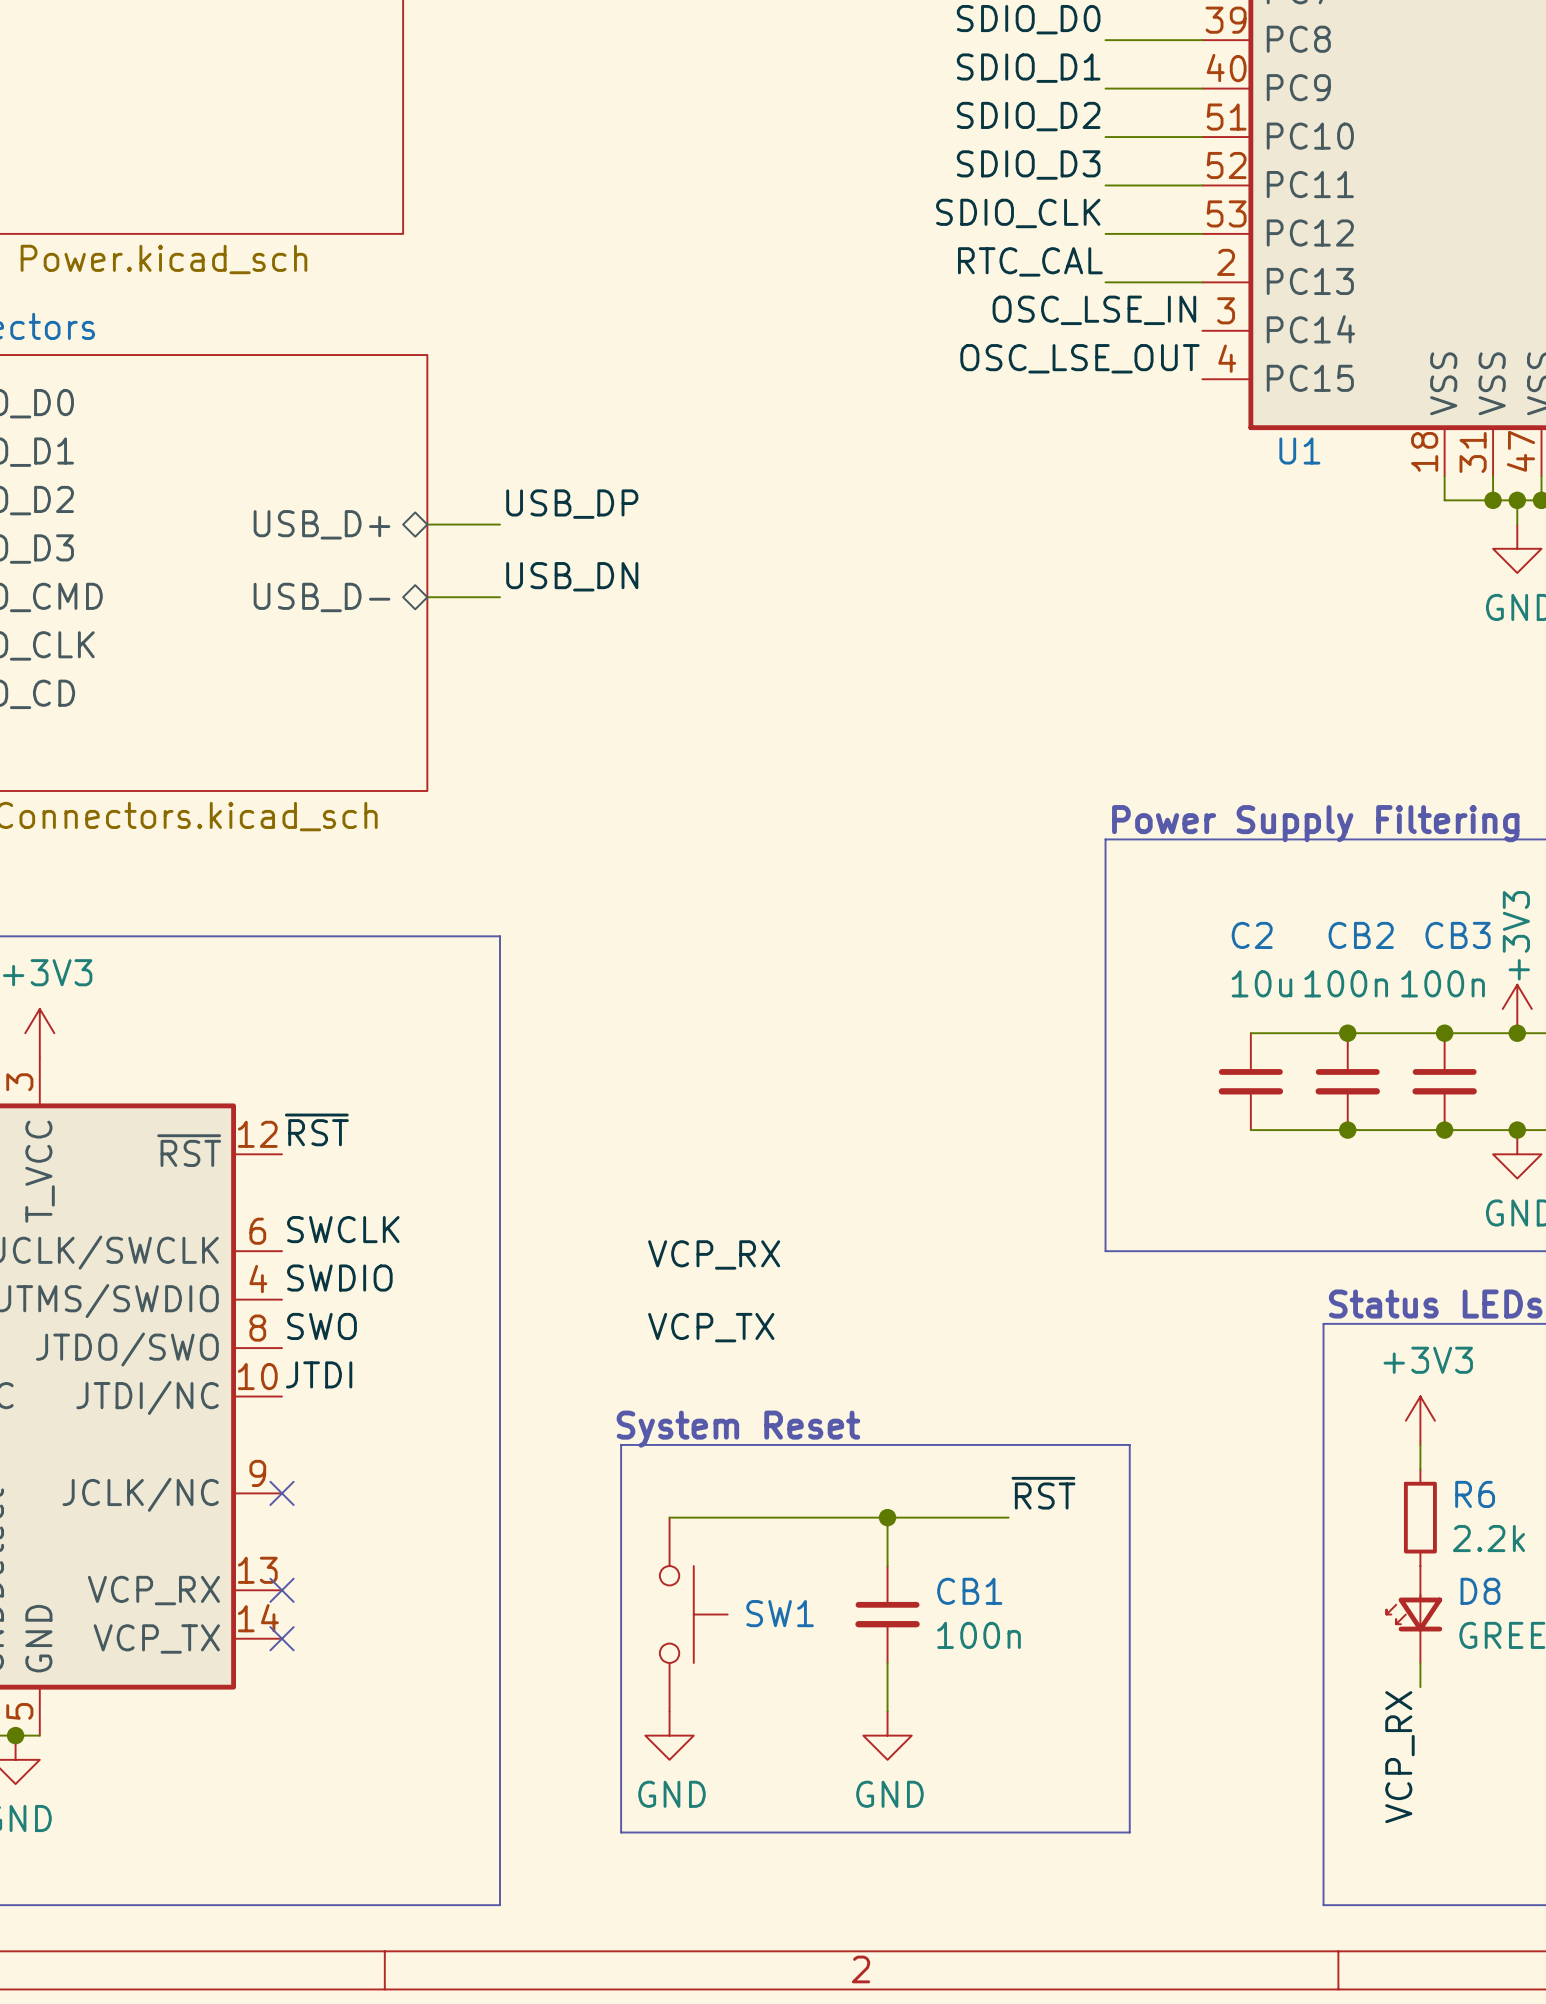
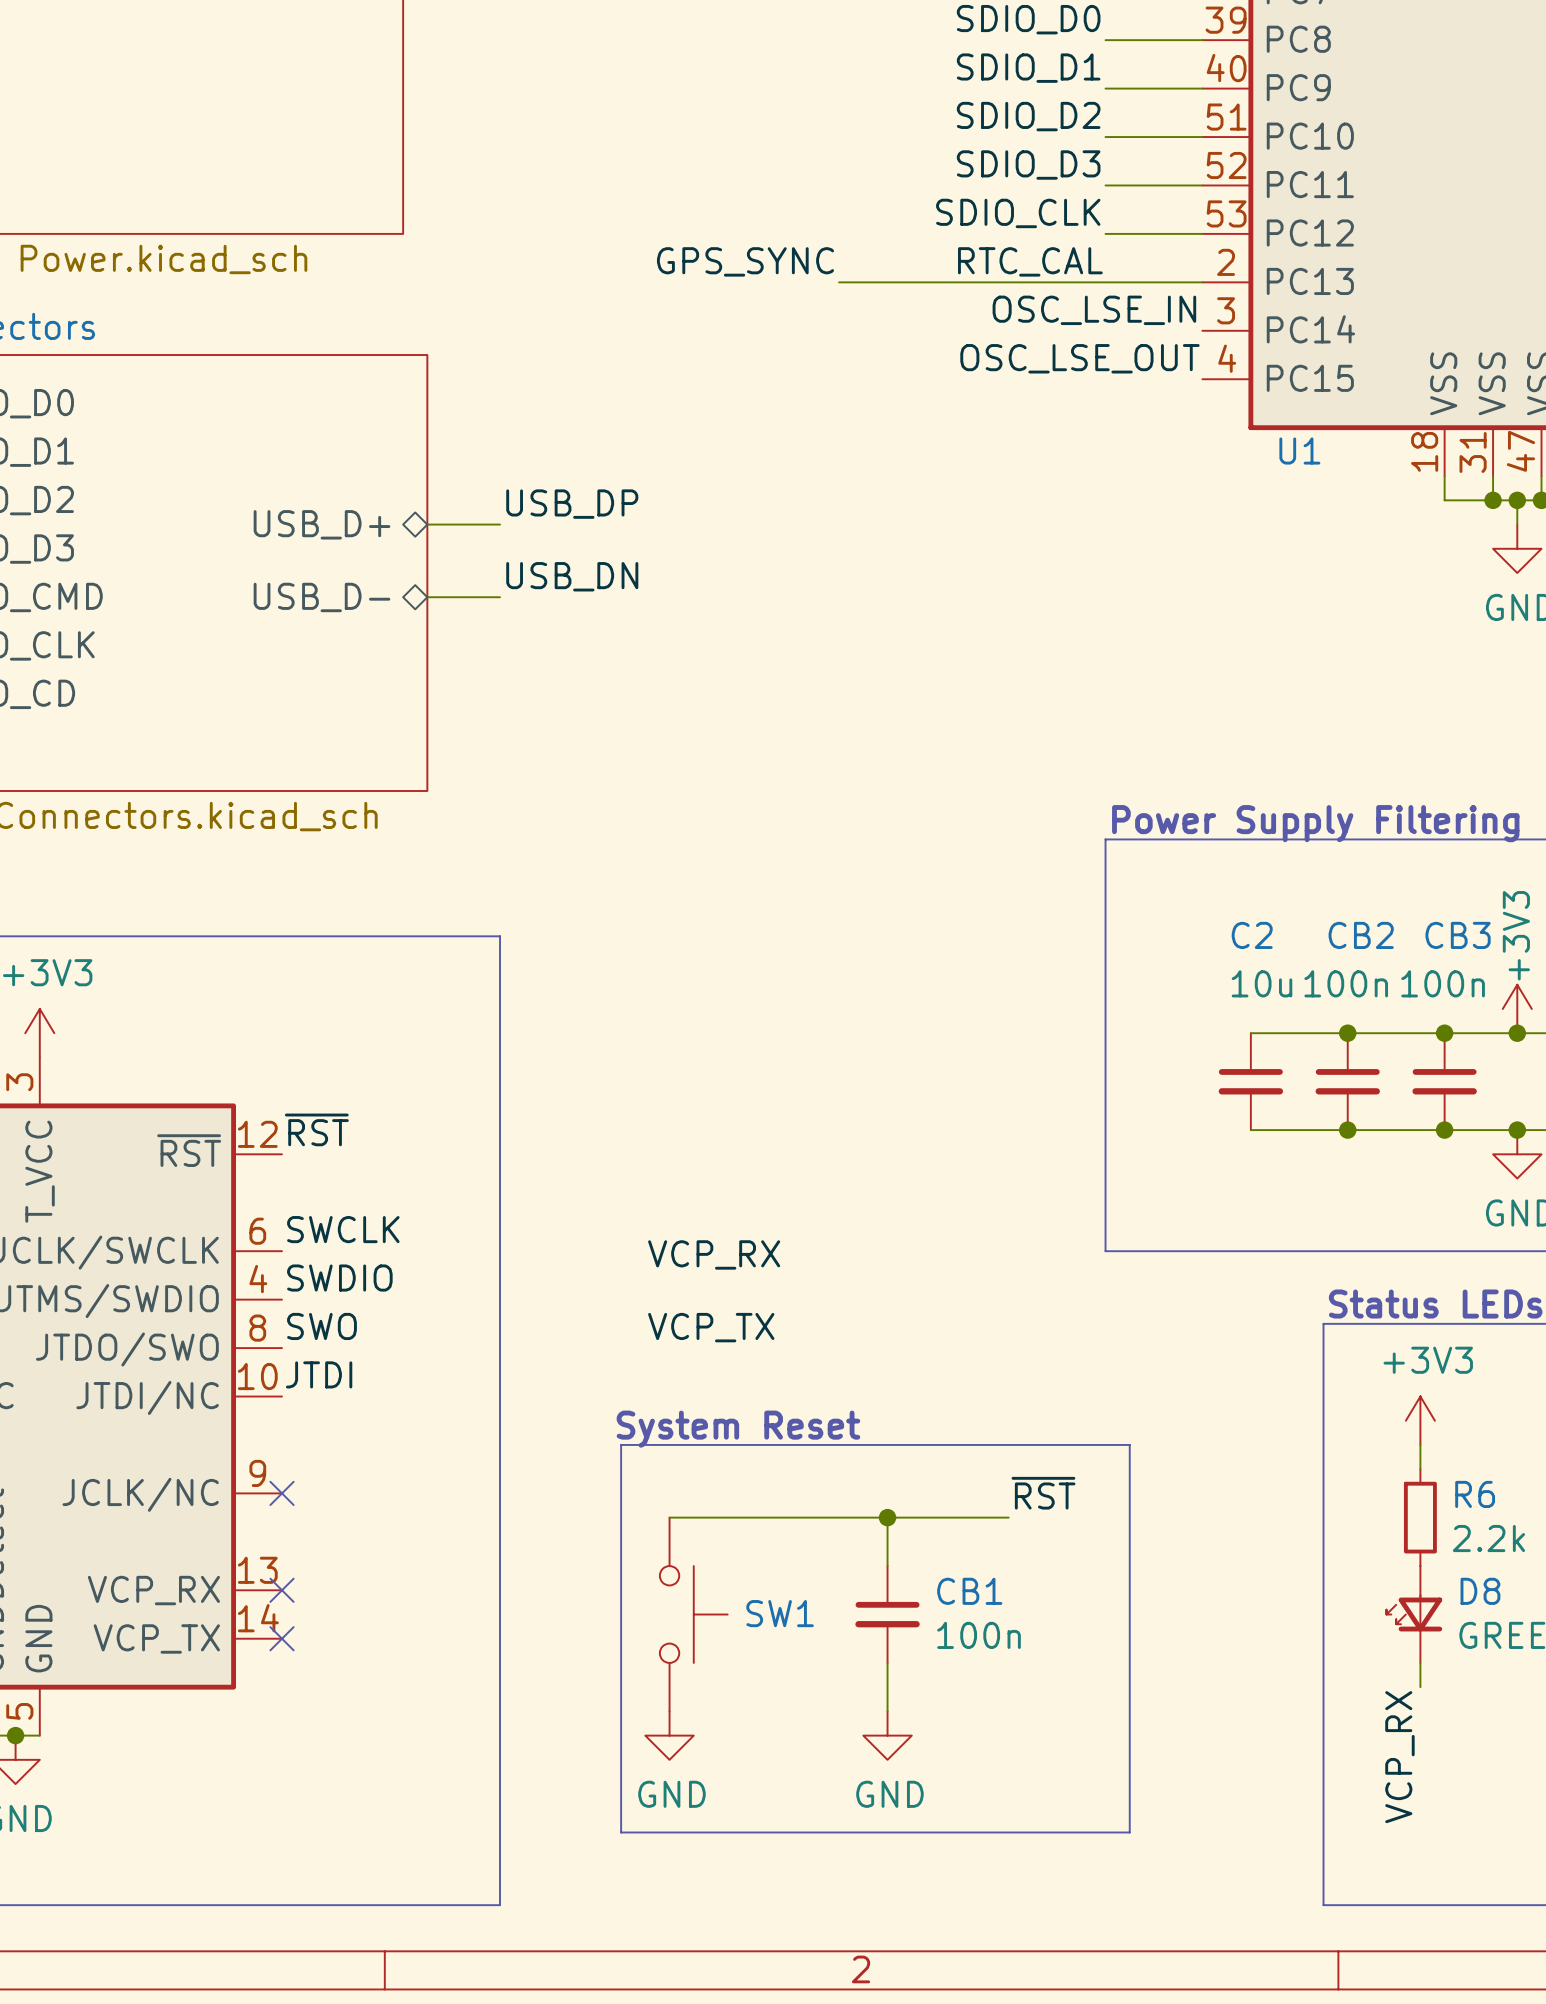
label: none -> GPS_SYNC (745, 261)
wire: none -> (839, 282) (1105, 282)

